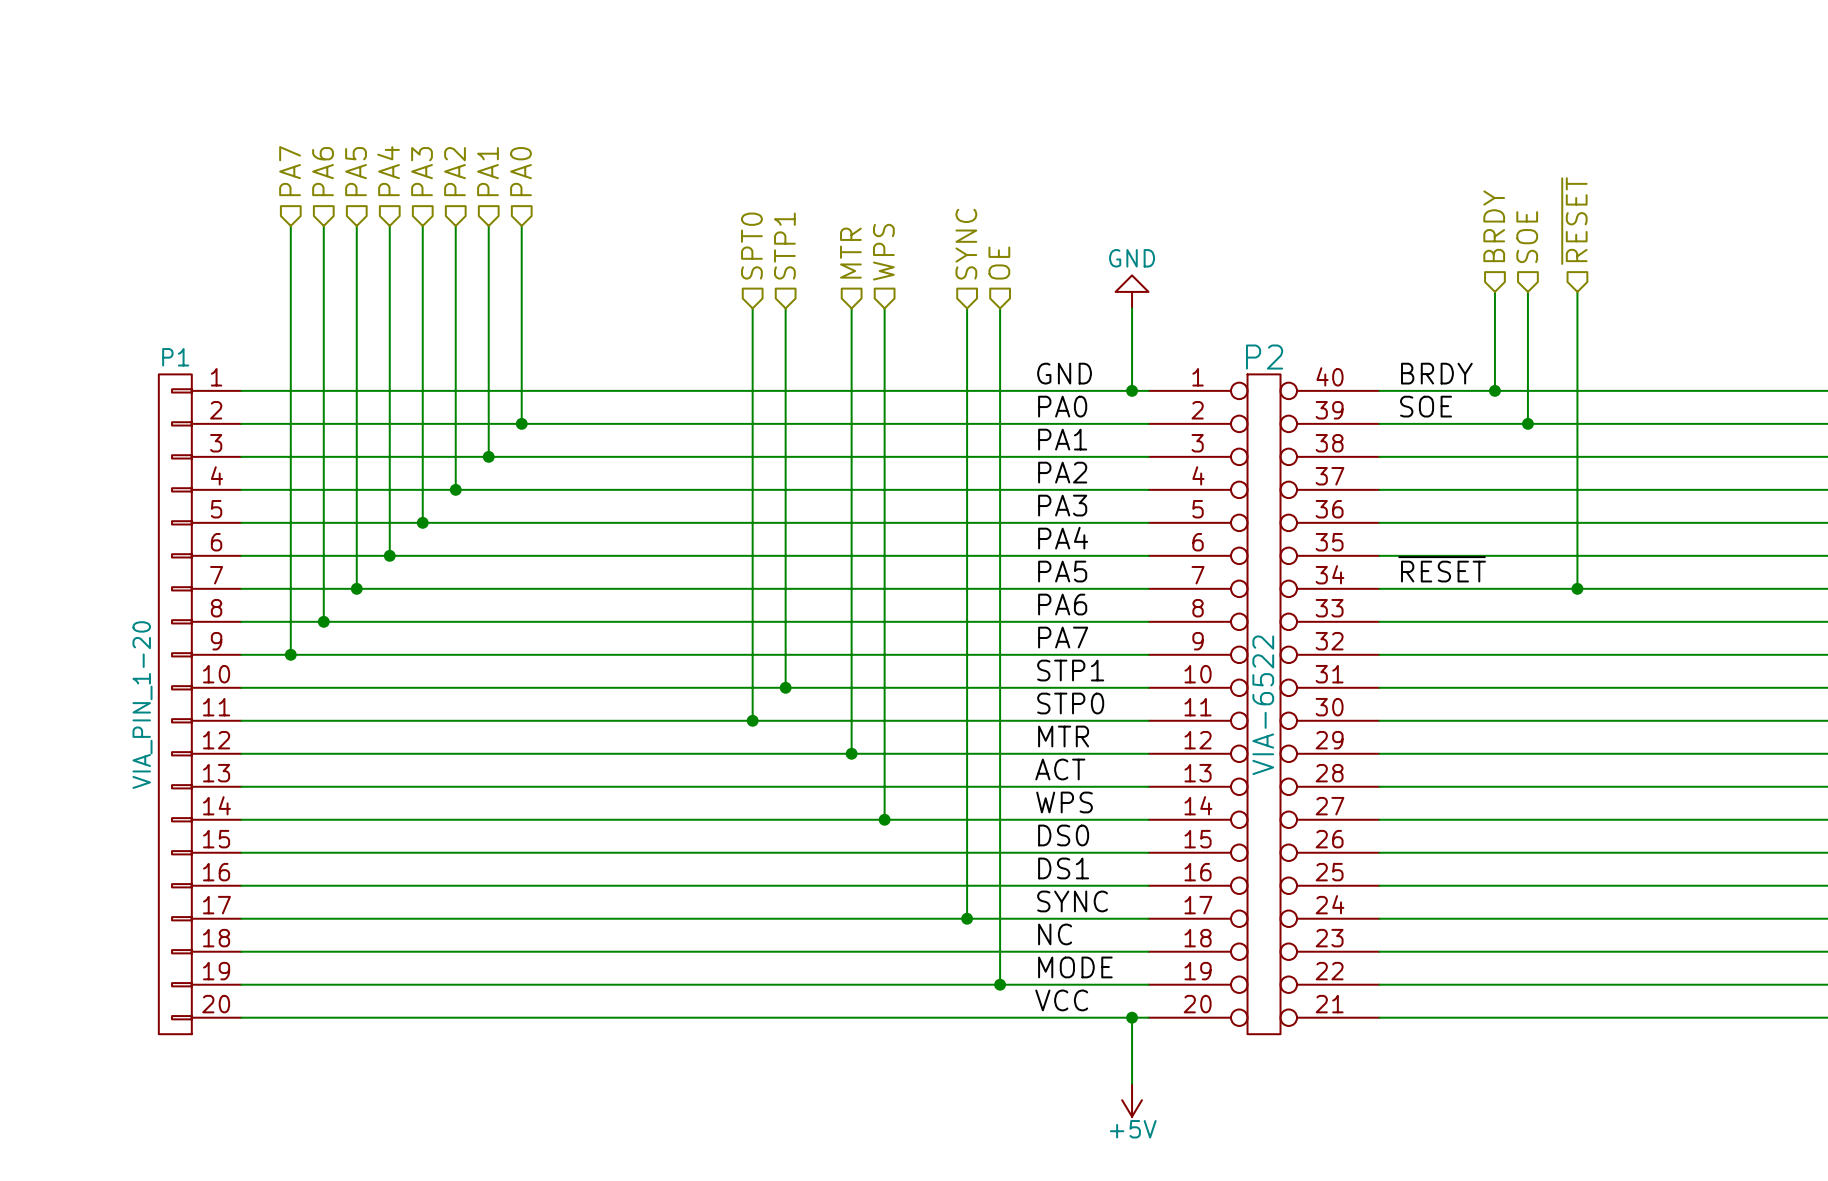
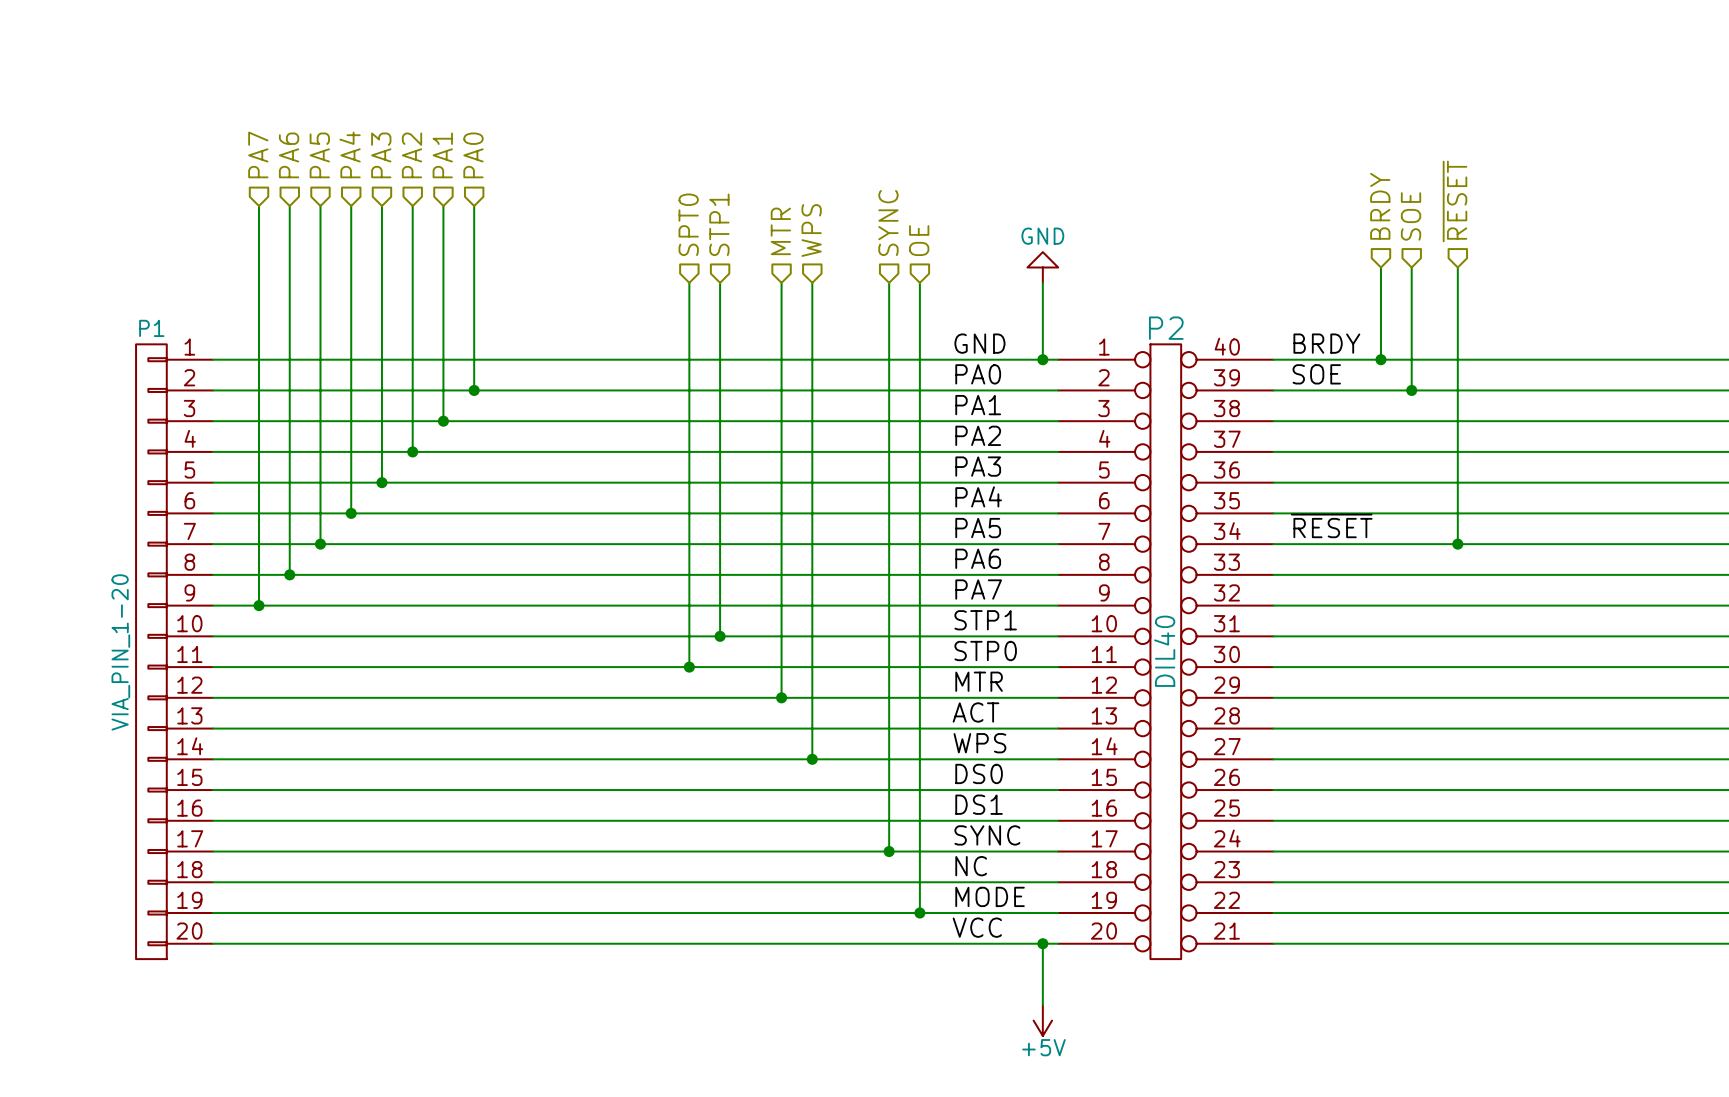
P2 value: VIA-6522 (1263, 705) -> DIL40 (1164, 651)

